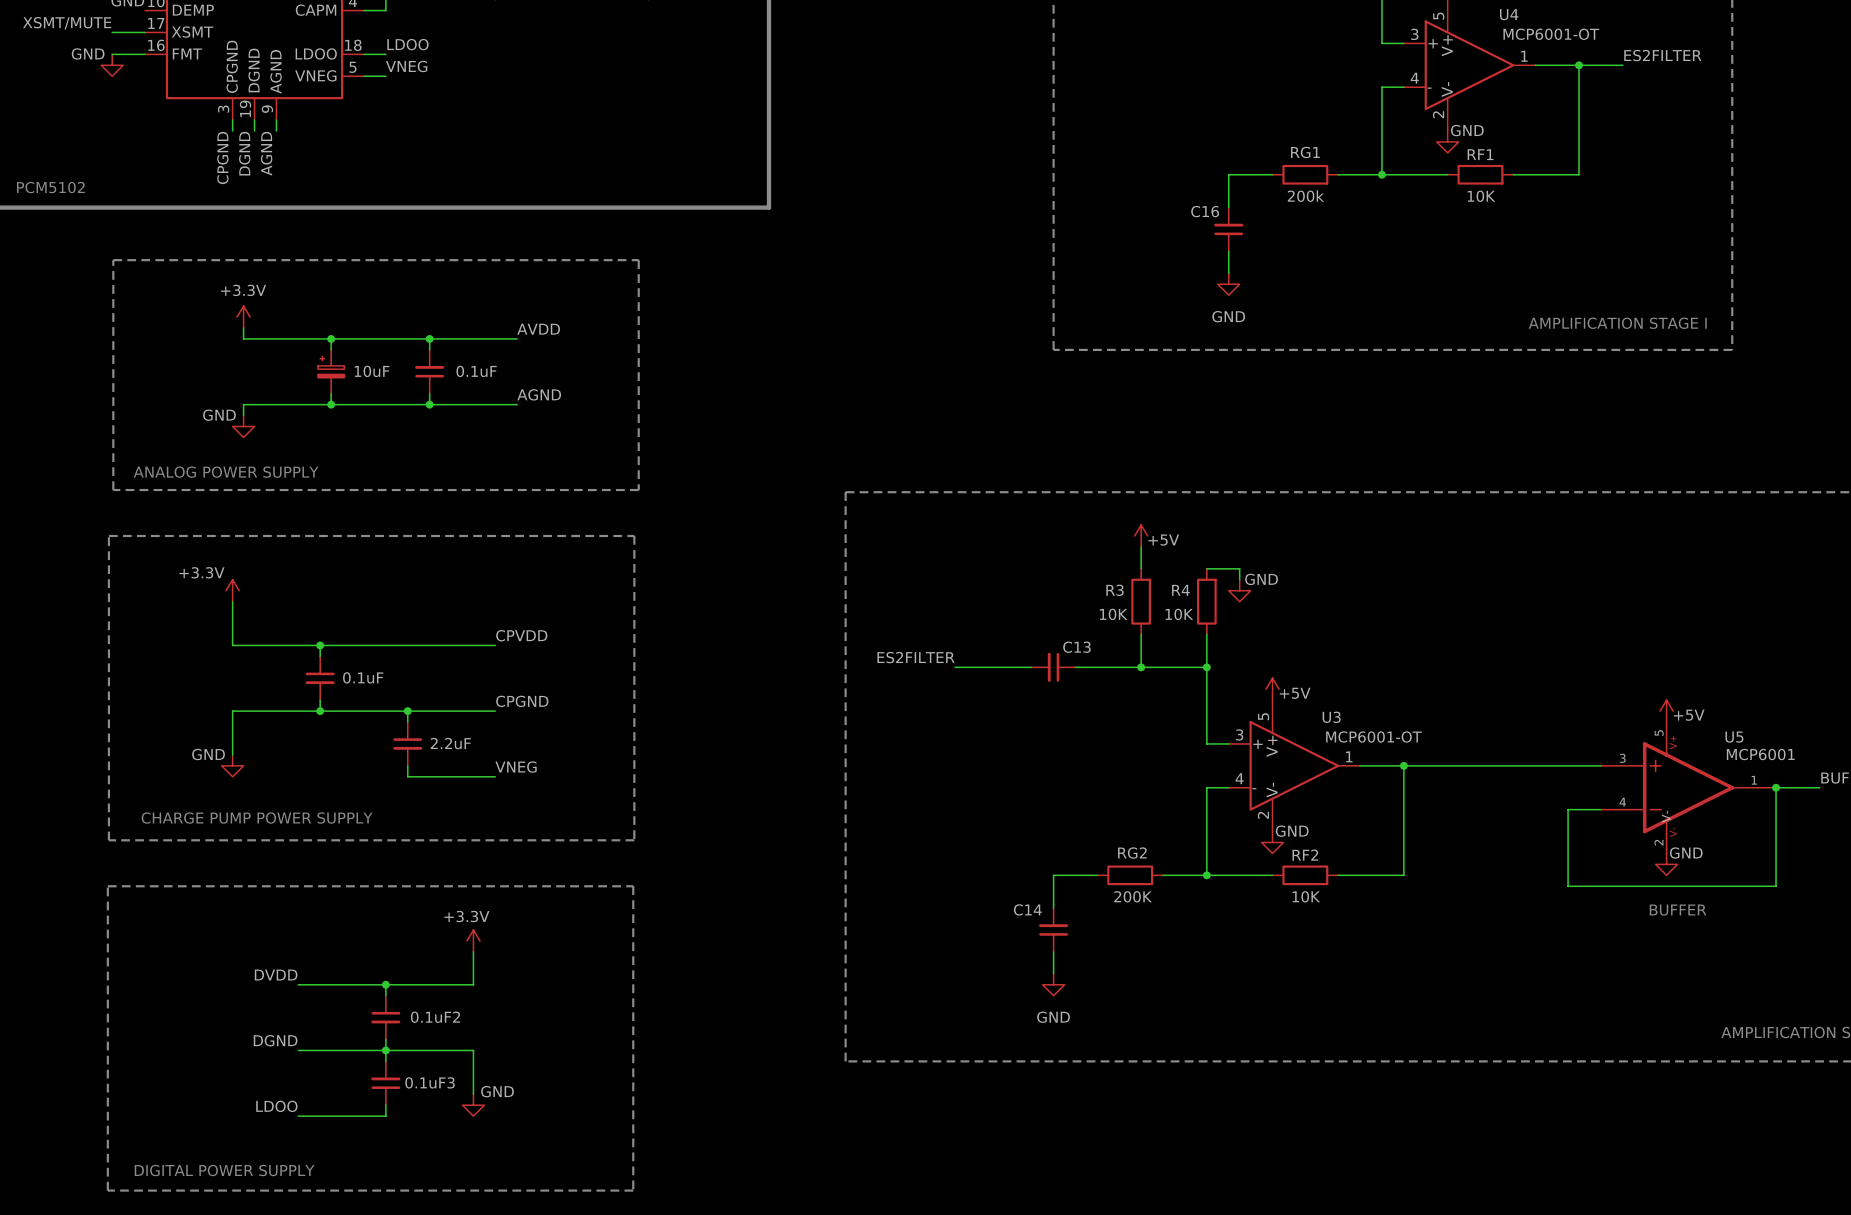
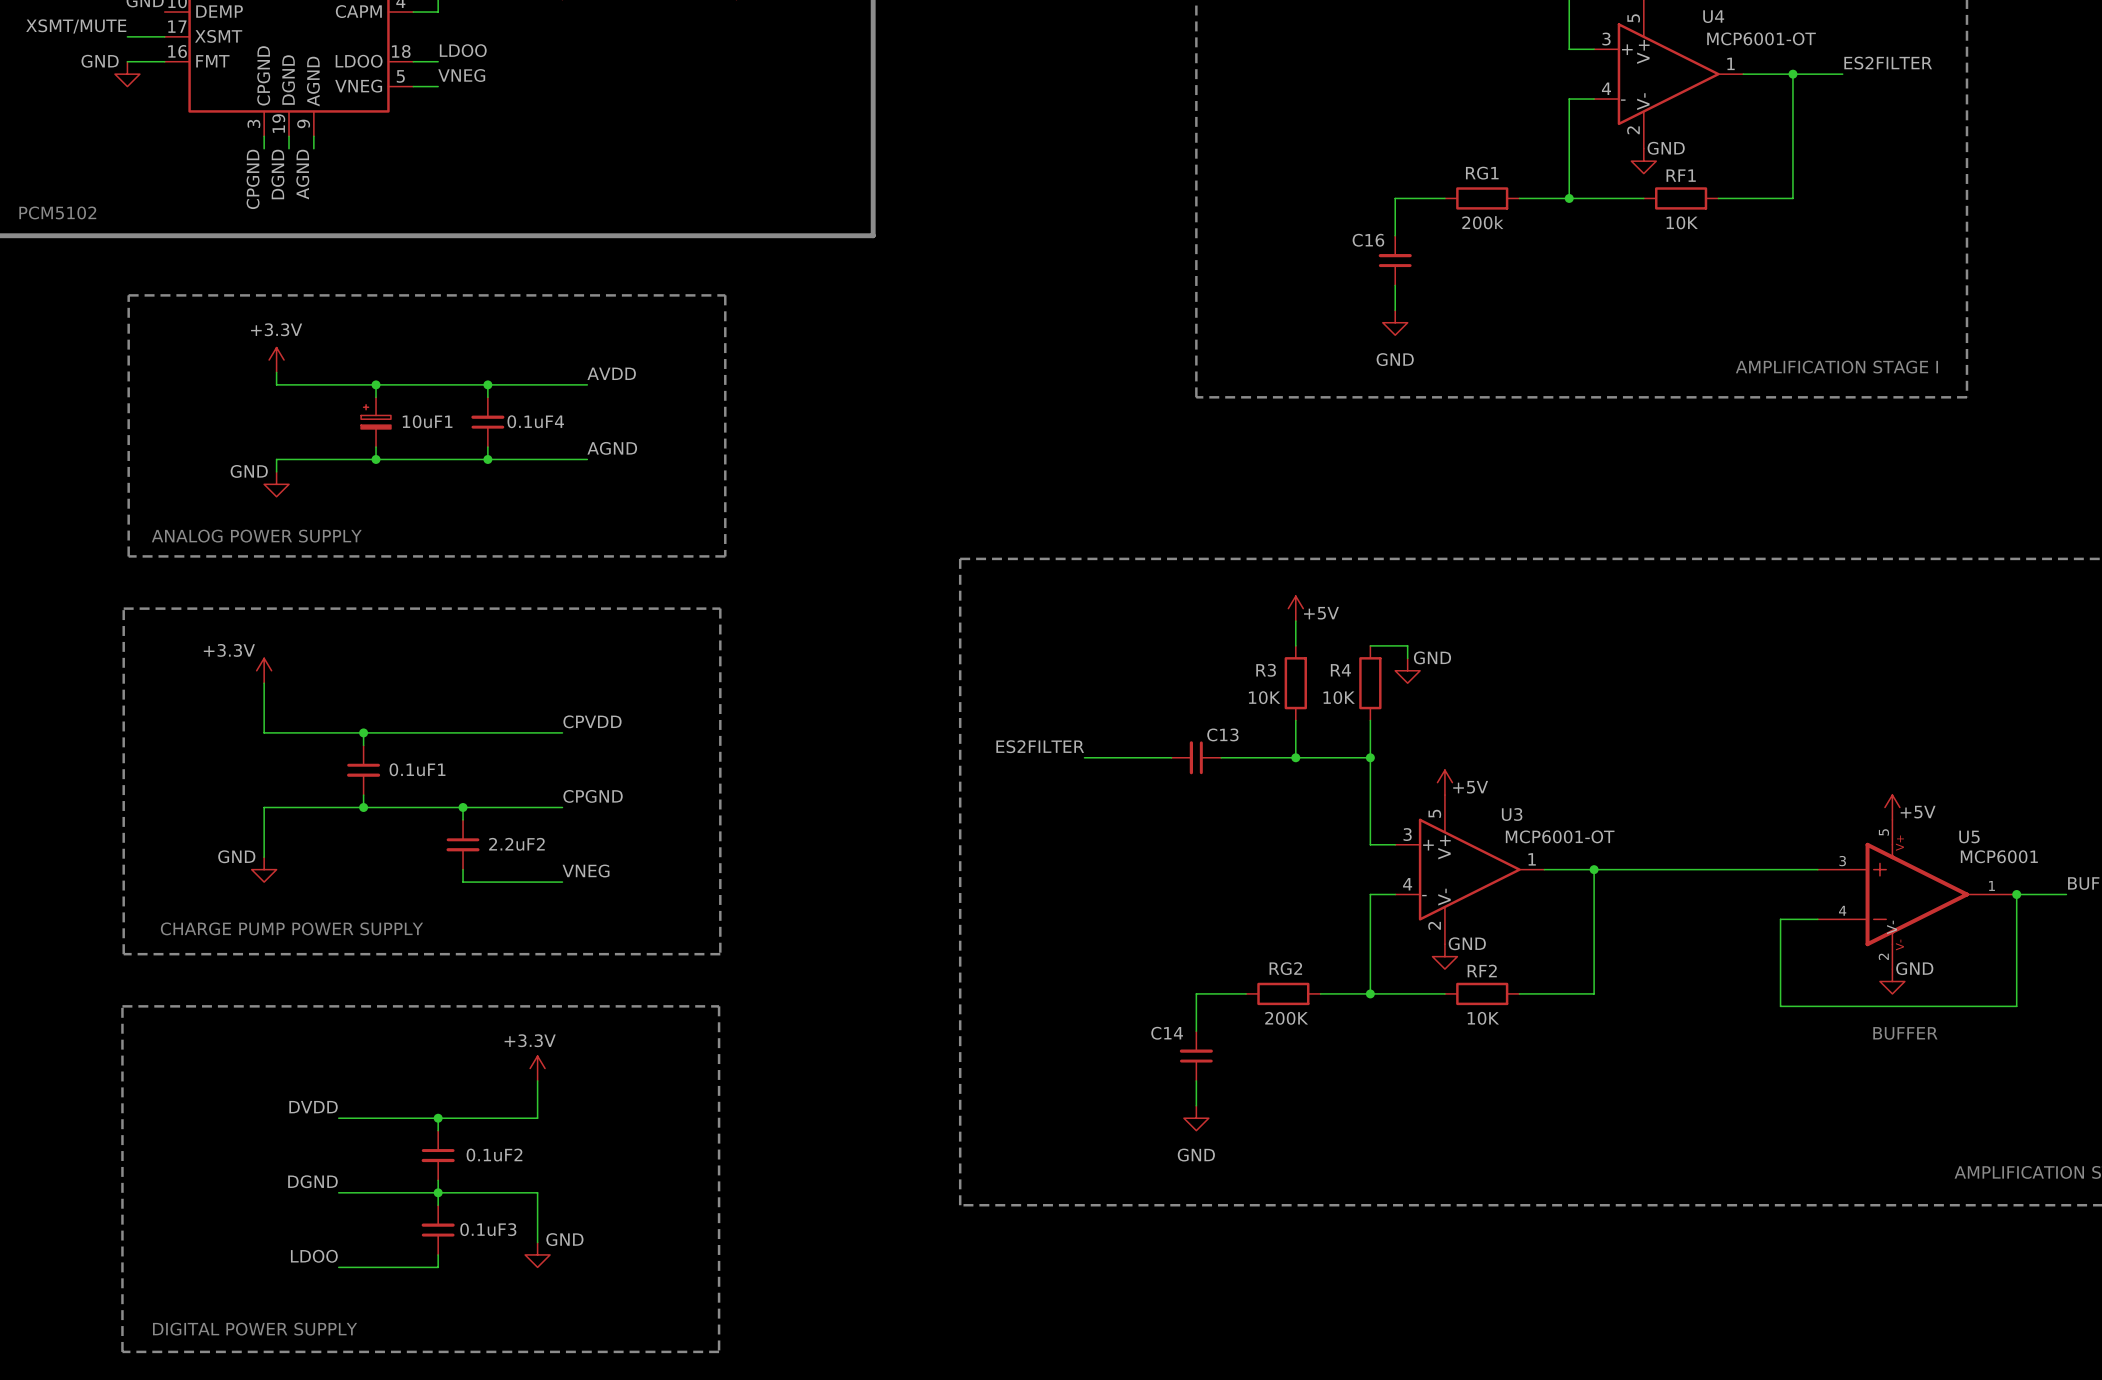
10uF name: 10uF (372, 371) -> 10uF1 (427, 421)
0.1uF name: 0.1uF (476, 371) -> 0.1uF4 (535, 421)
0.1uF name: 0.1uF (363, 677) -> 0.1uF1 (417, 769)
2.2uF name: 2.2uF (450, 743) -> 2.2uF2 (516, 844)

